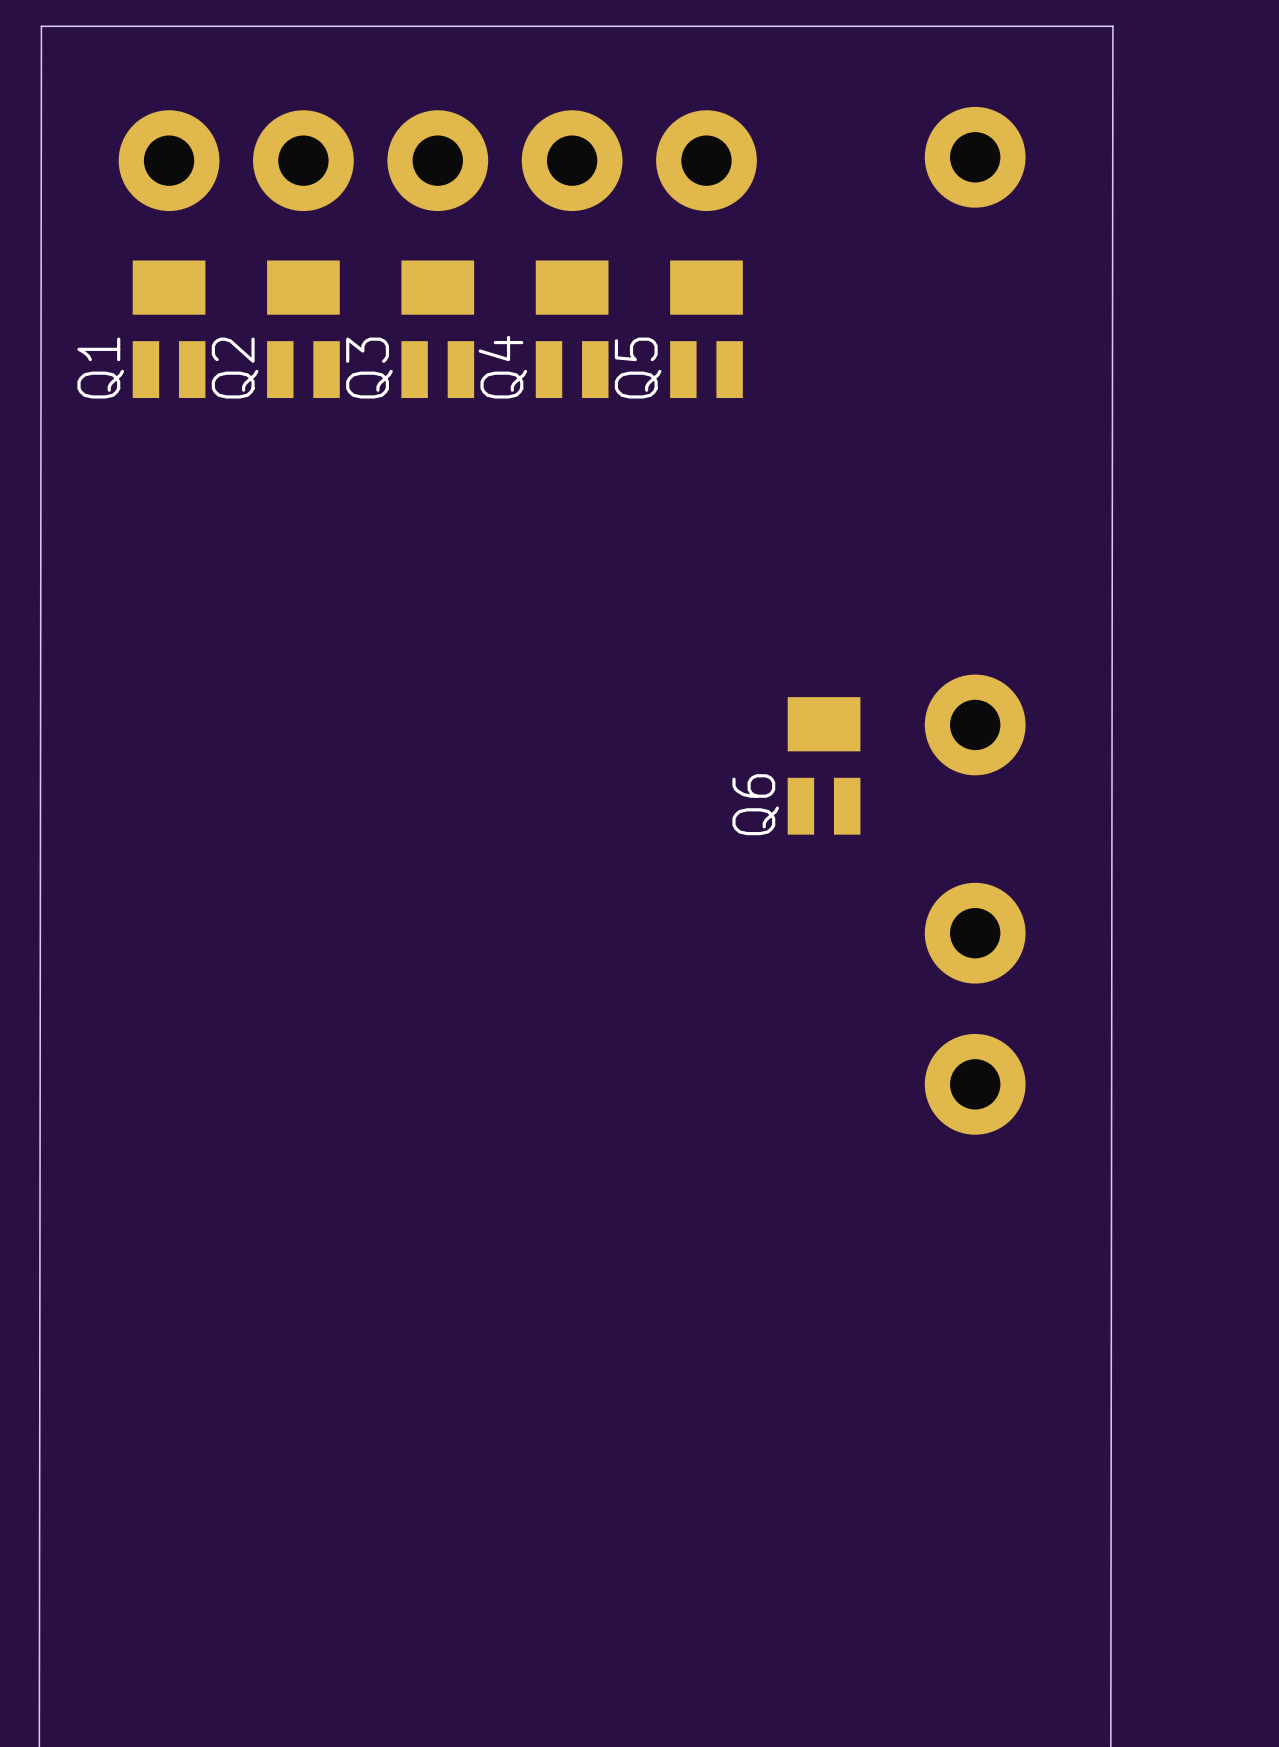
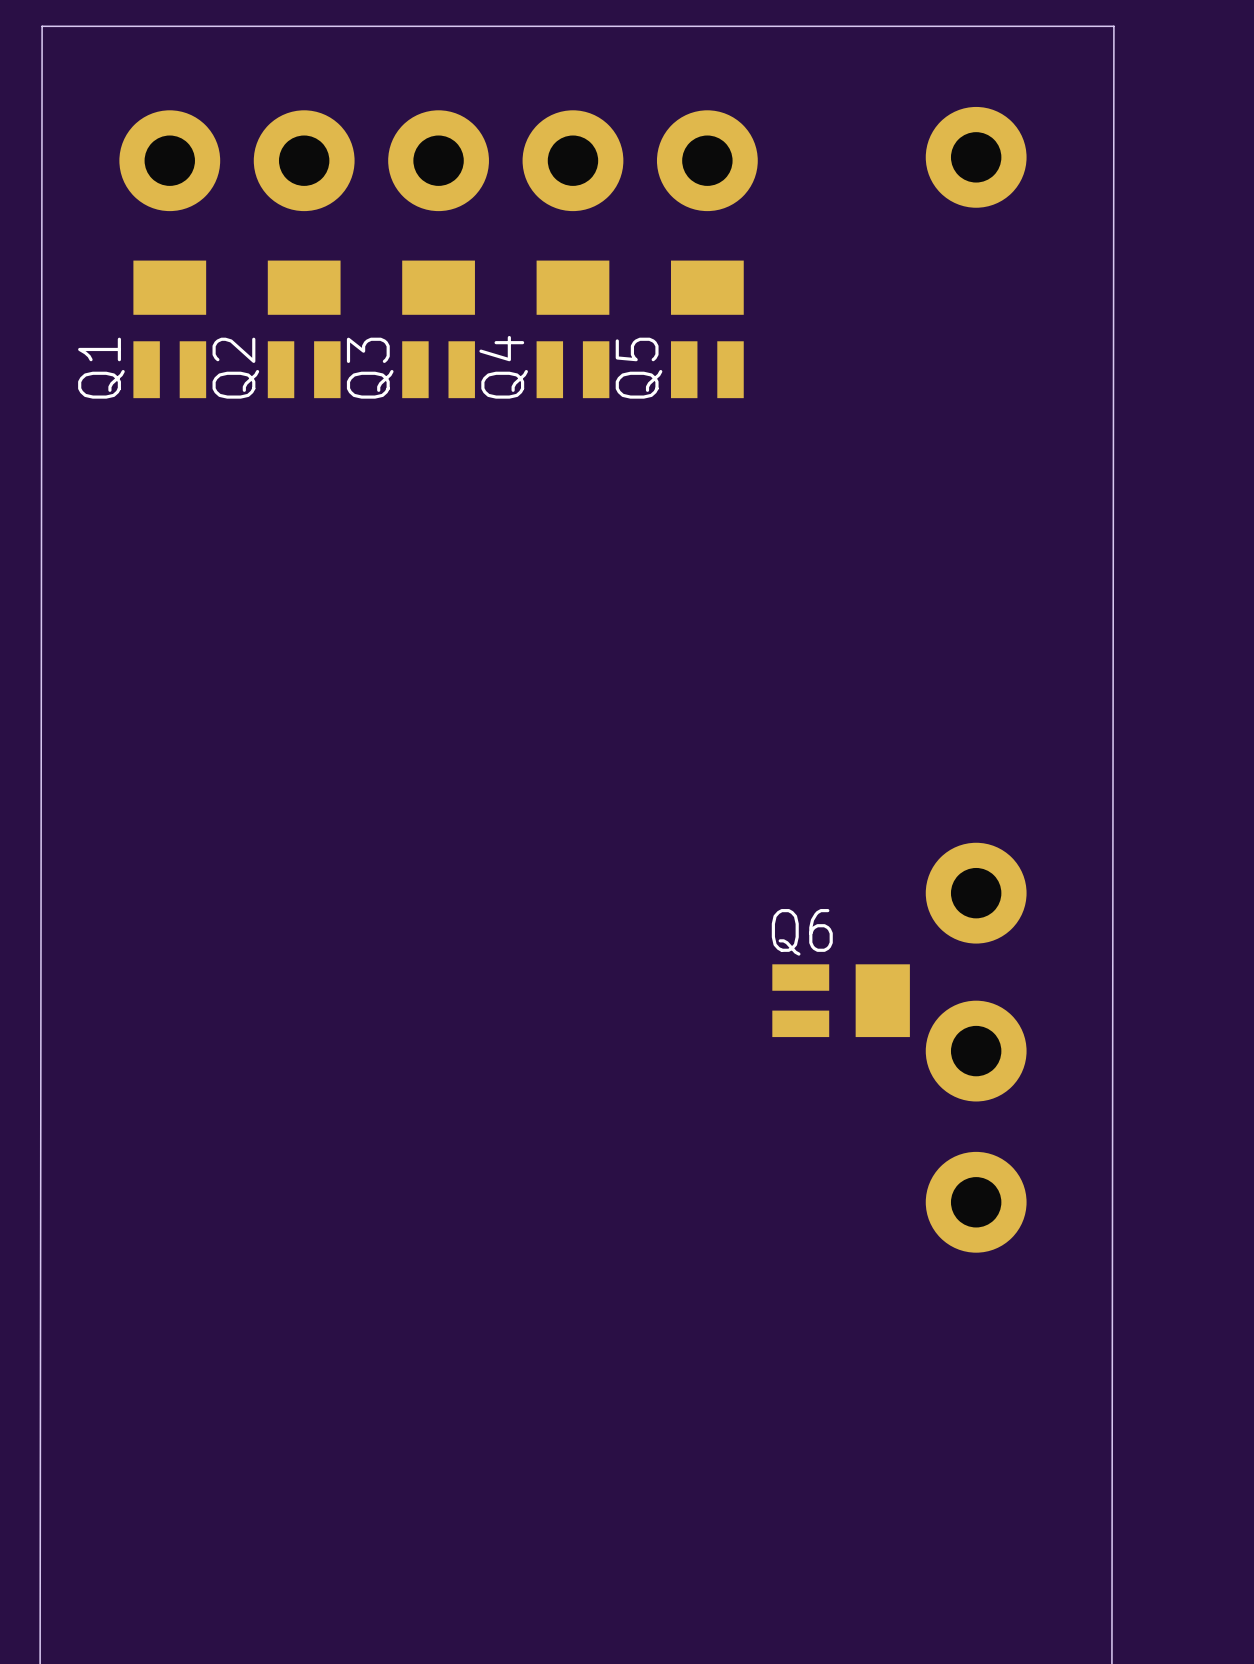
part position: (975, 724) -> (976, 1202)
Q6 rotation: 0° (824, 765) -> 90° clockwise (841, 1000)
Q6 position: (824, 765) -> (841, 1000)
part position: (975, 933) -> (976, 893)
part position: (975, 1084) -> (976, 1051)

